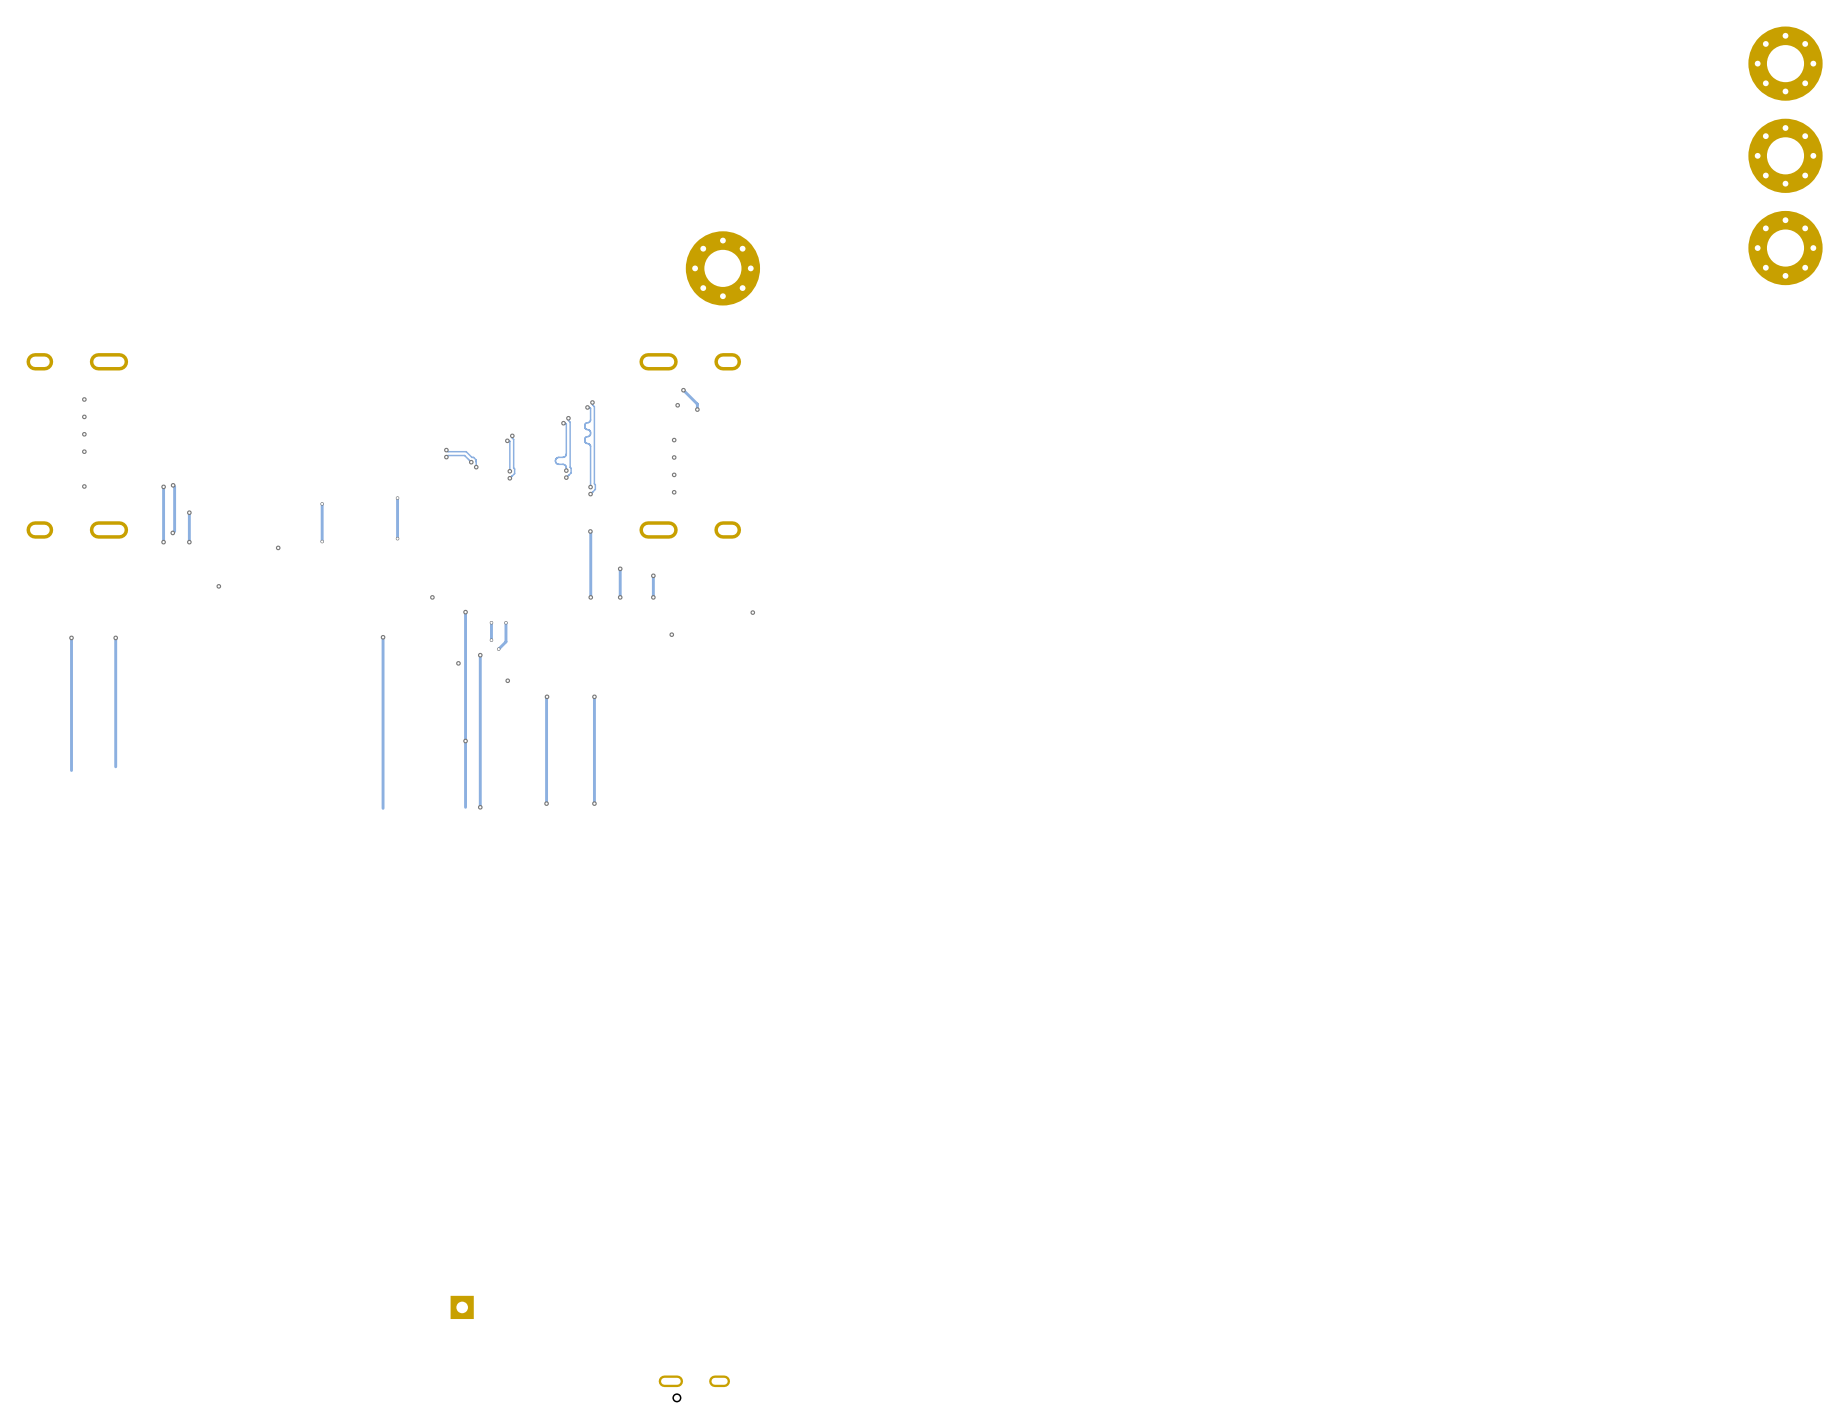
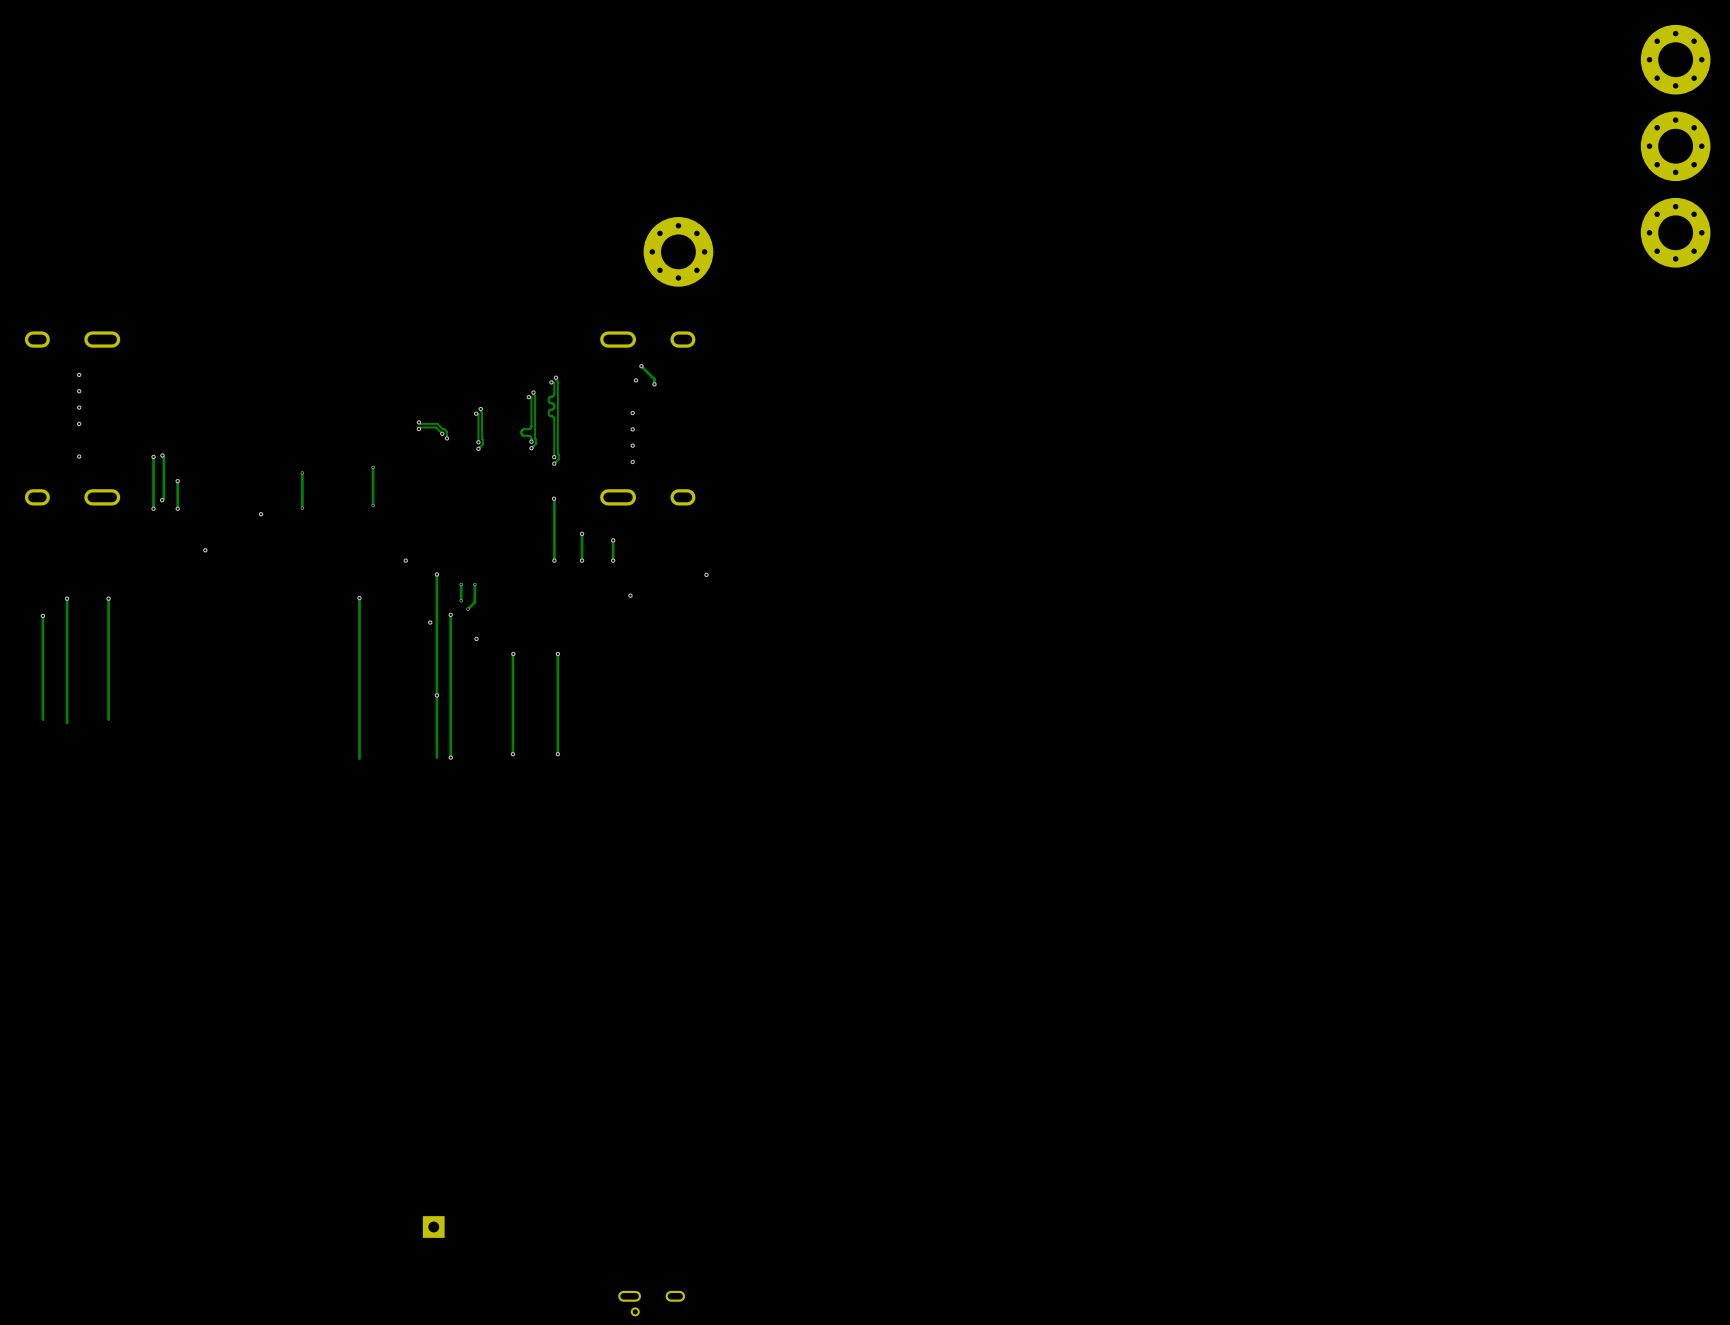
track: none -> (42, 615) (42, 719)
via: none -> (42, 615)

